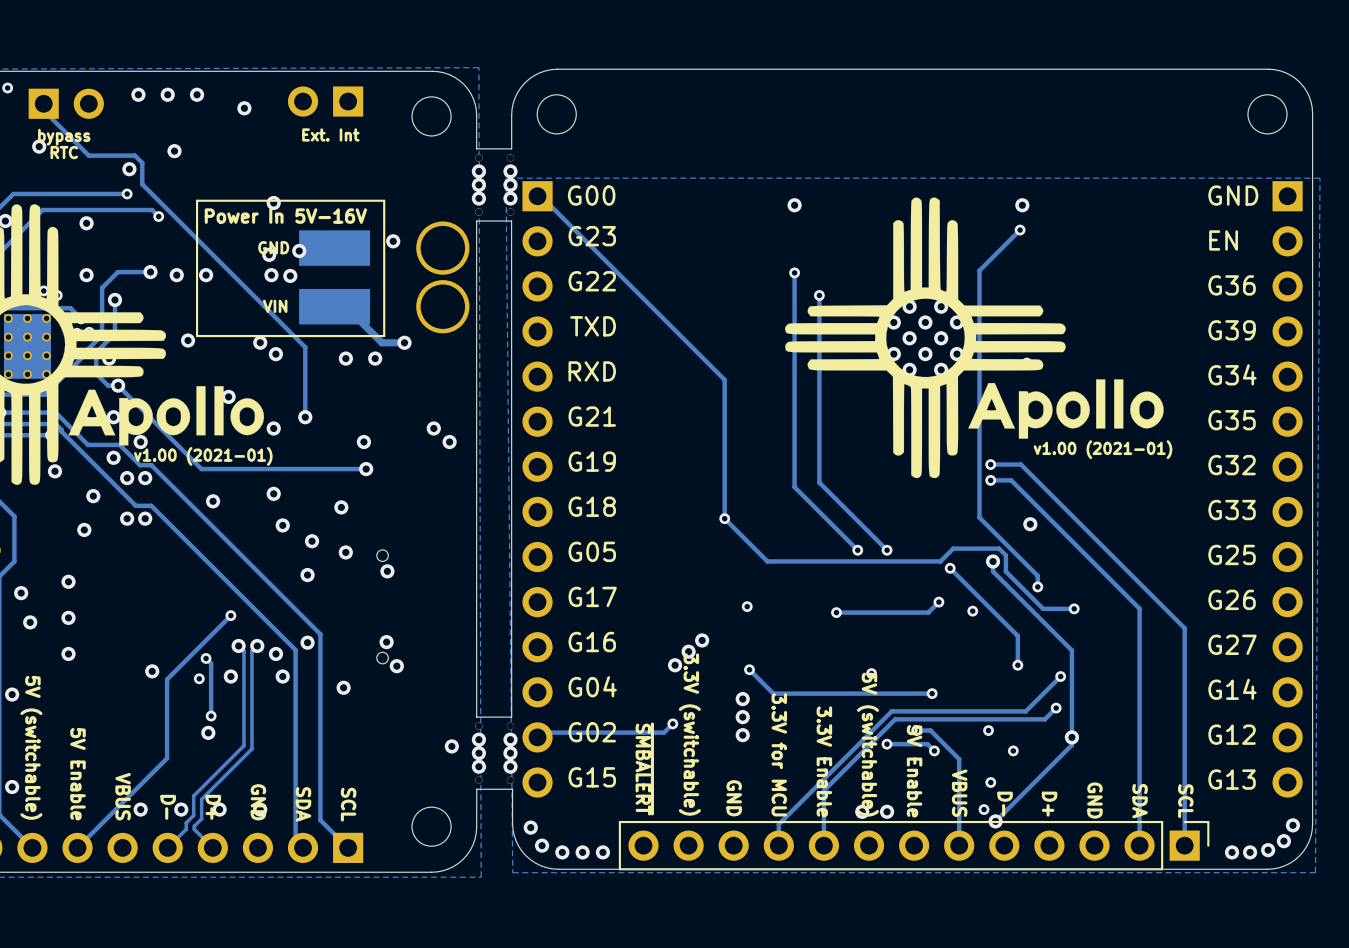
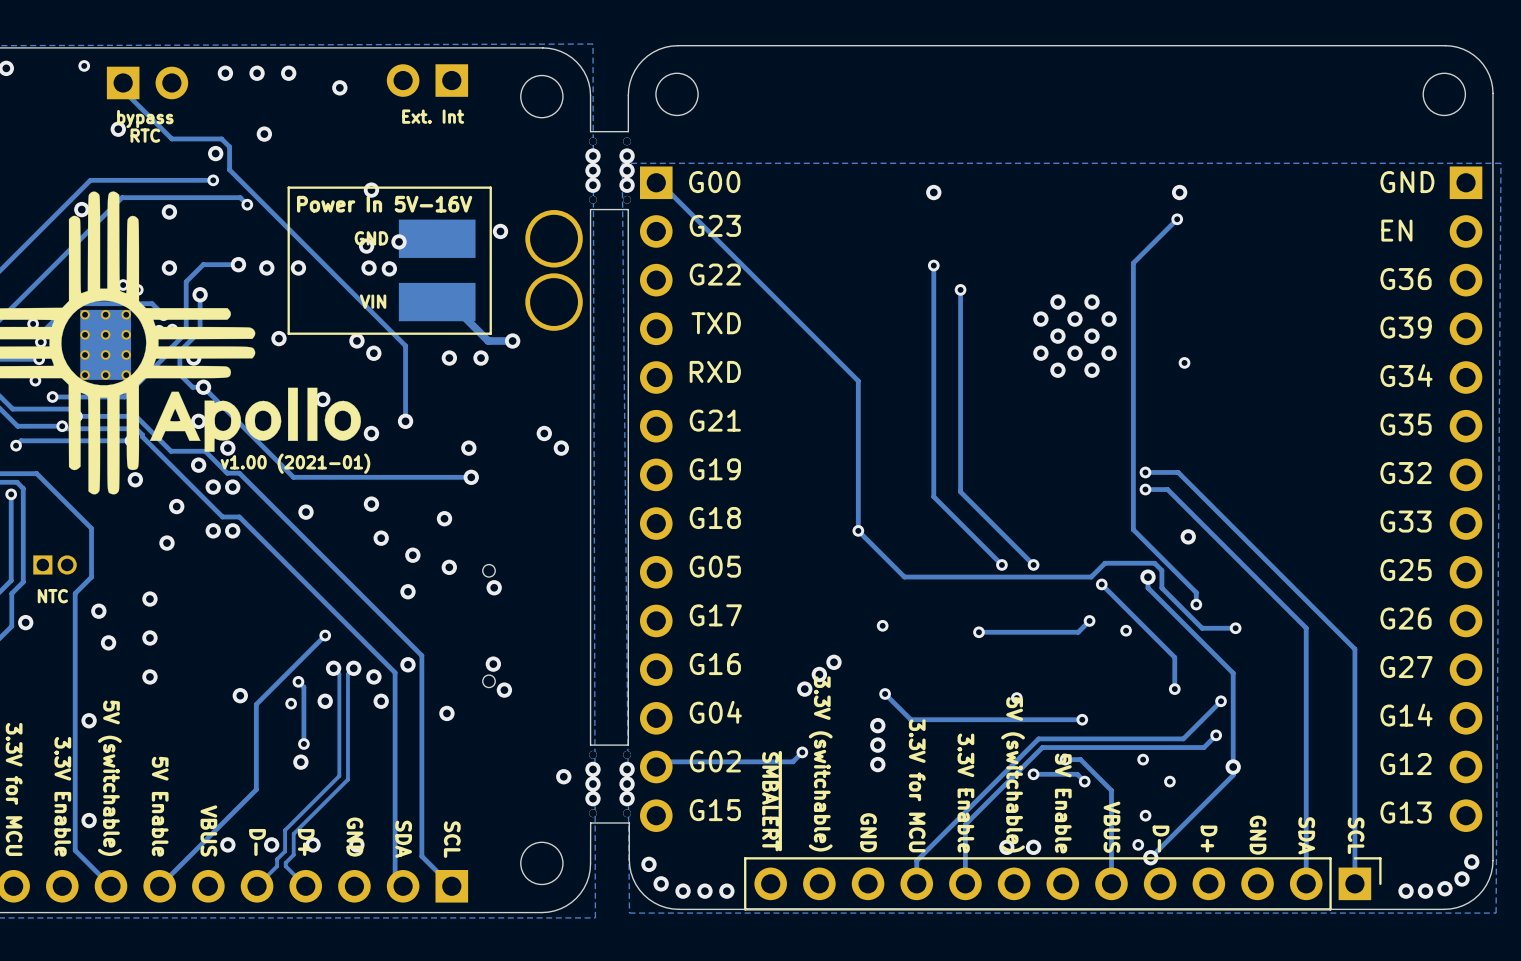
drawing: [784, 197, 1164, 479] -> none
text: v1.00 (2021-01) (1103, 449) -> none

